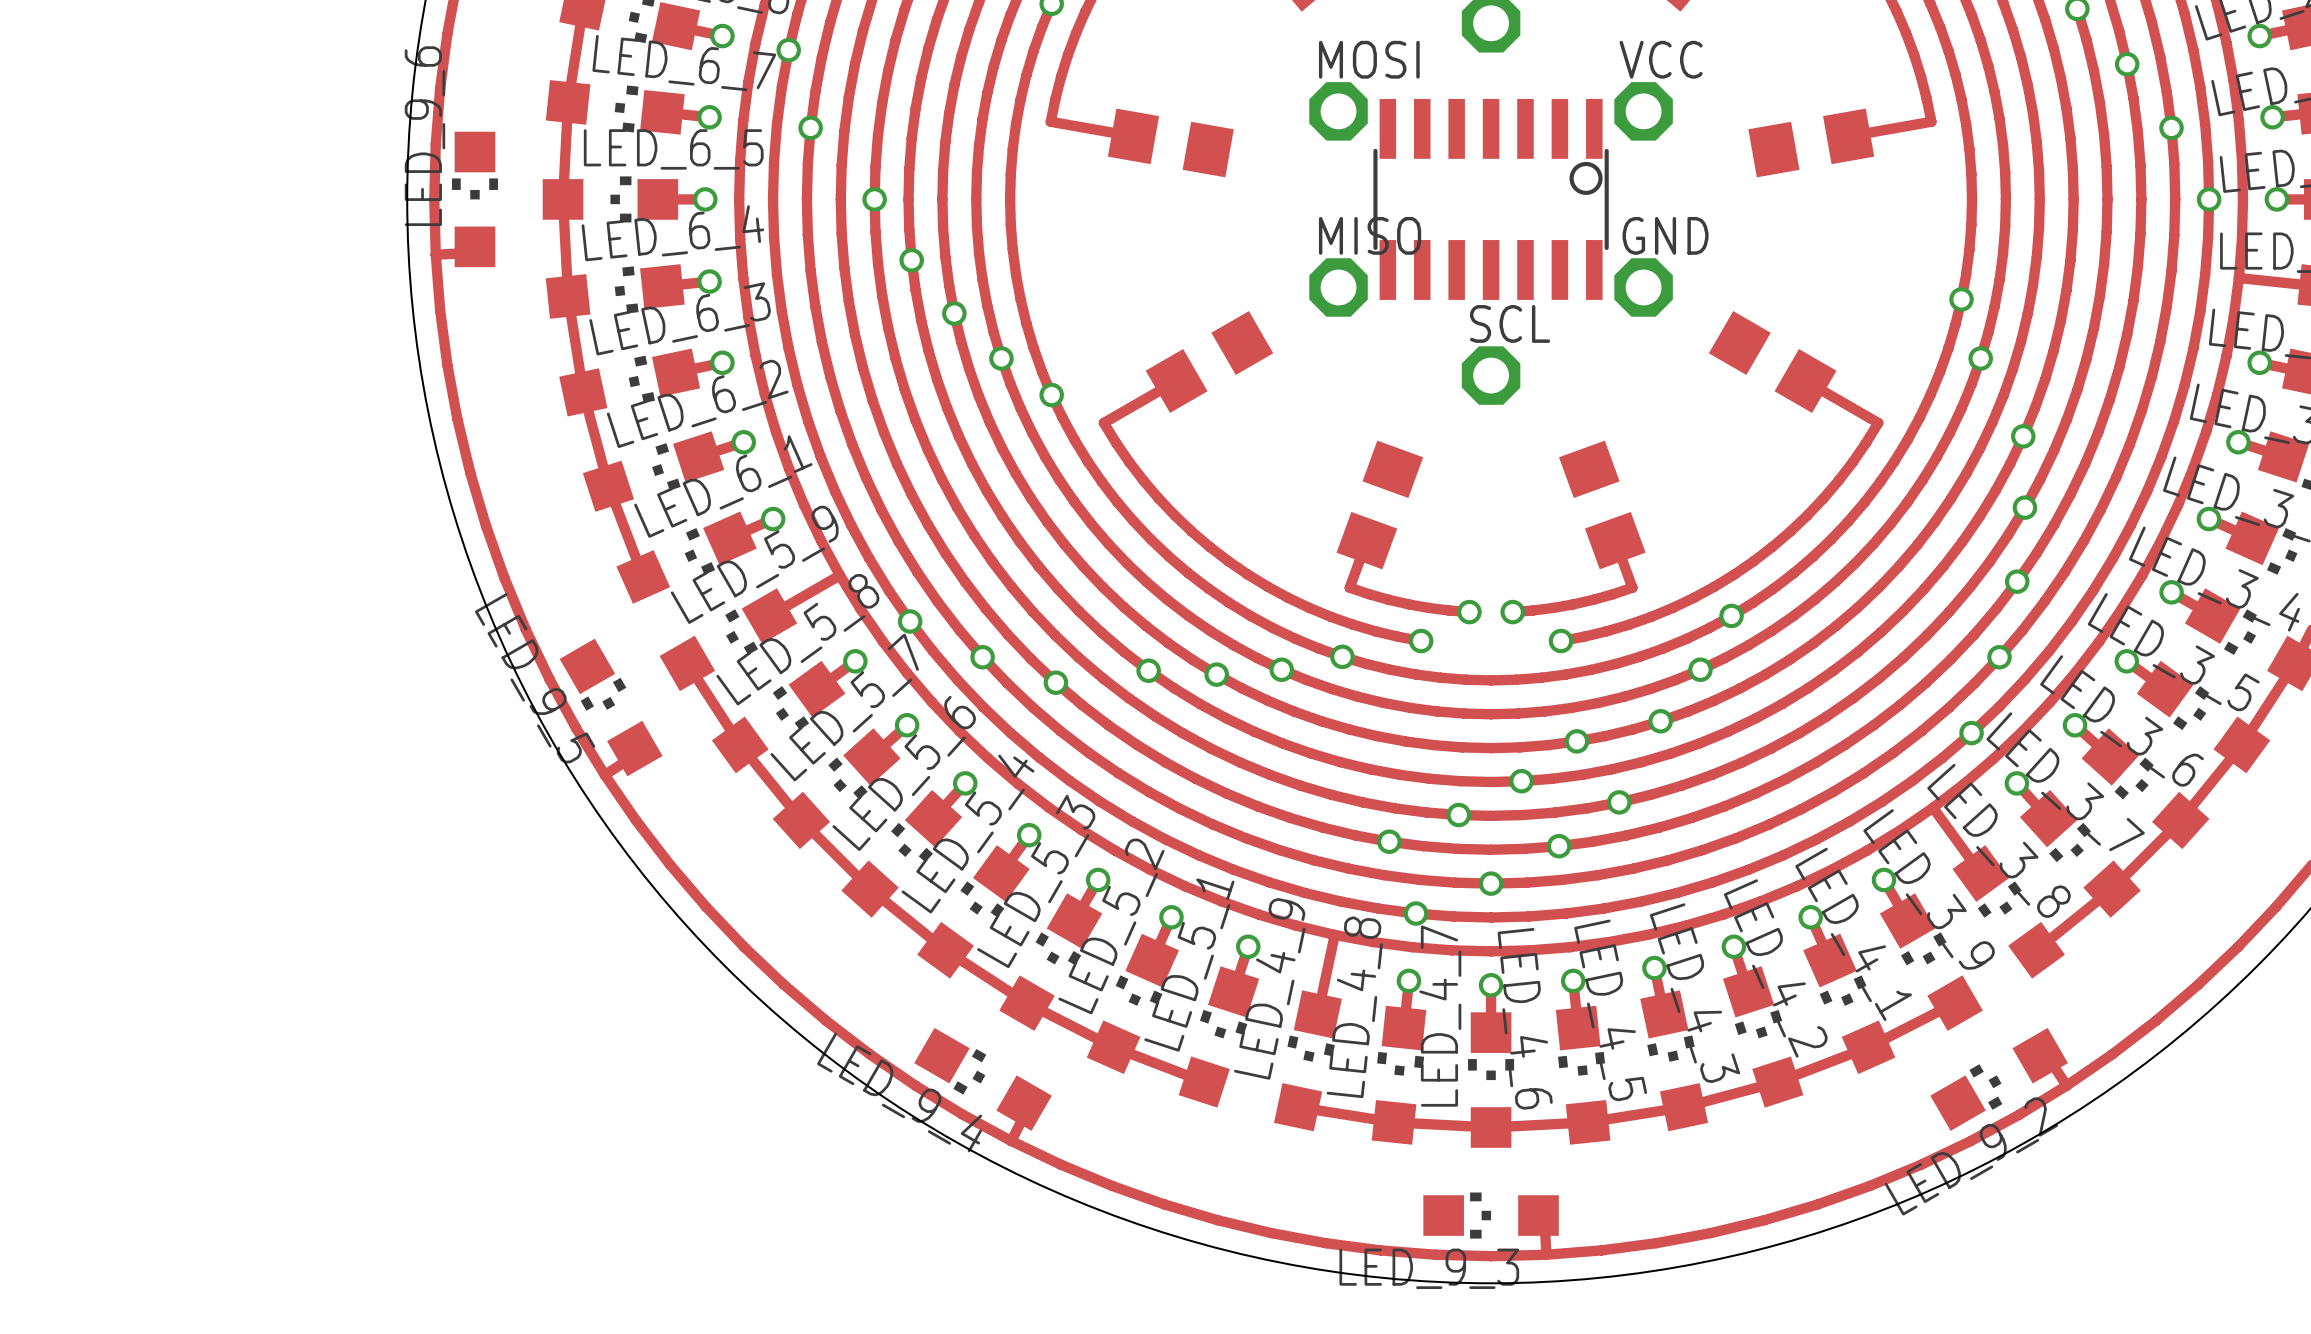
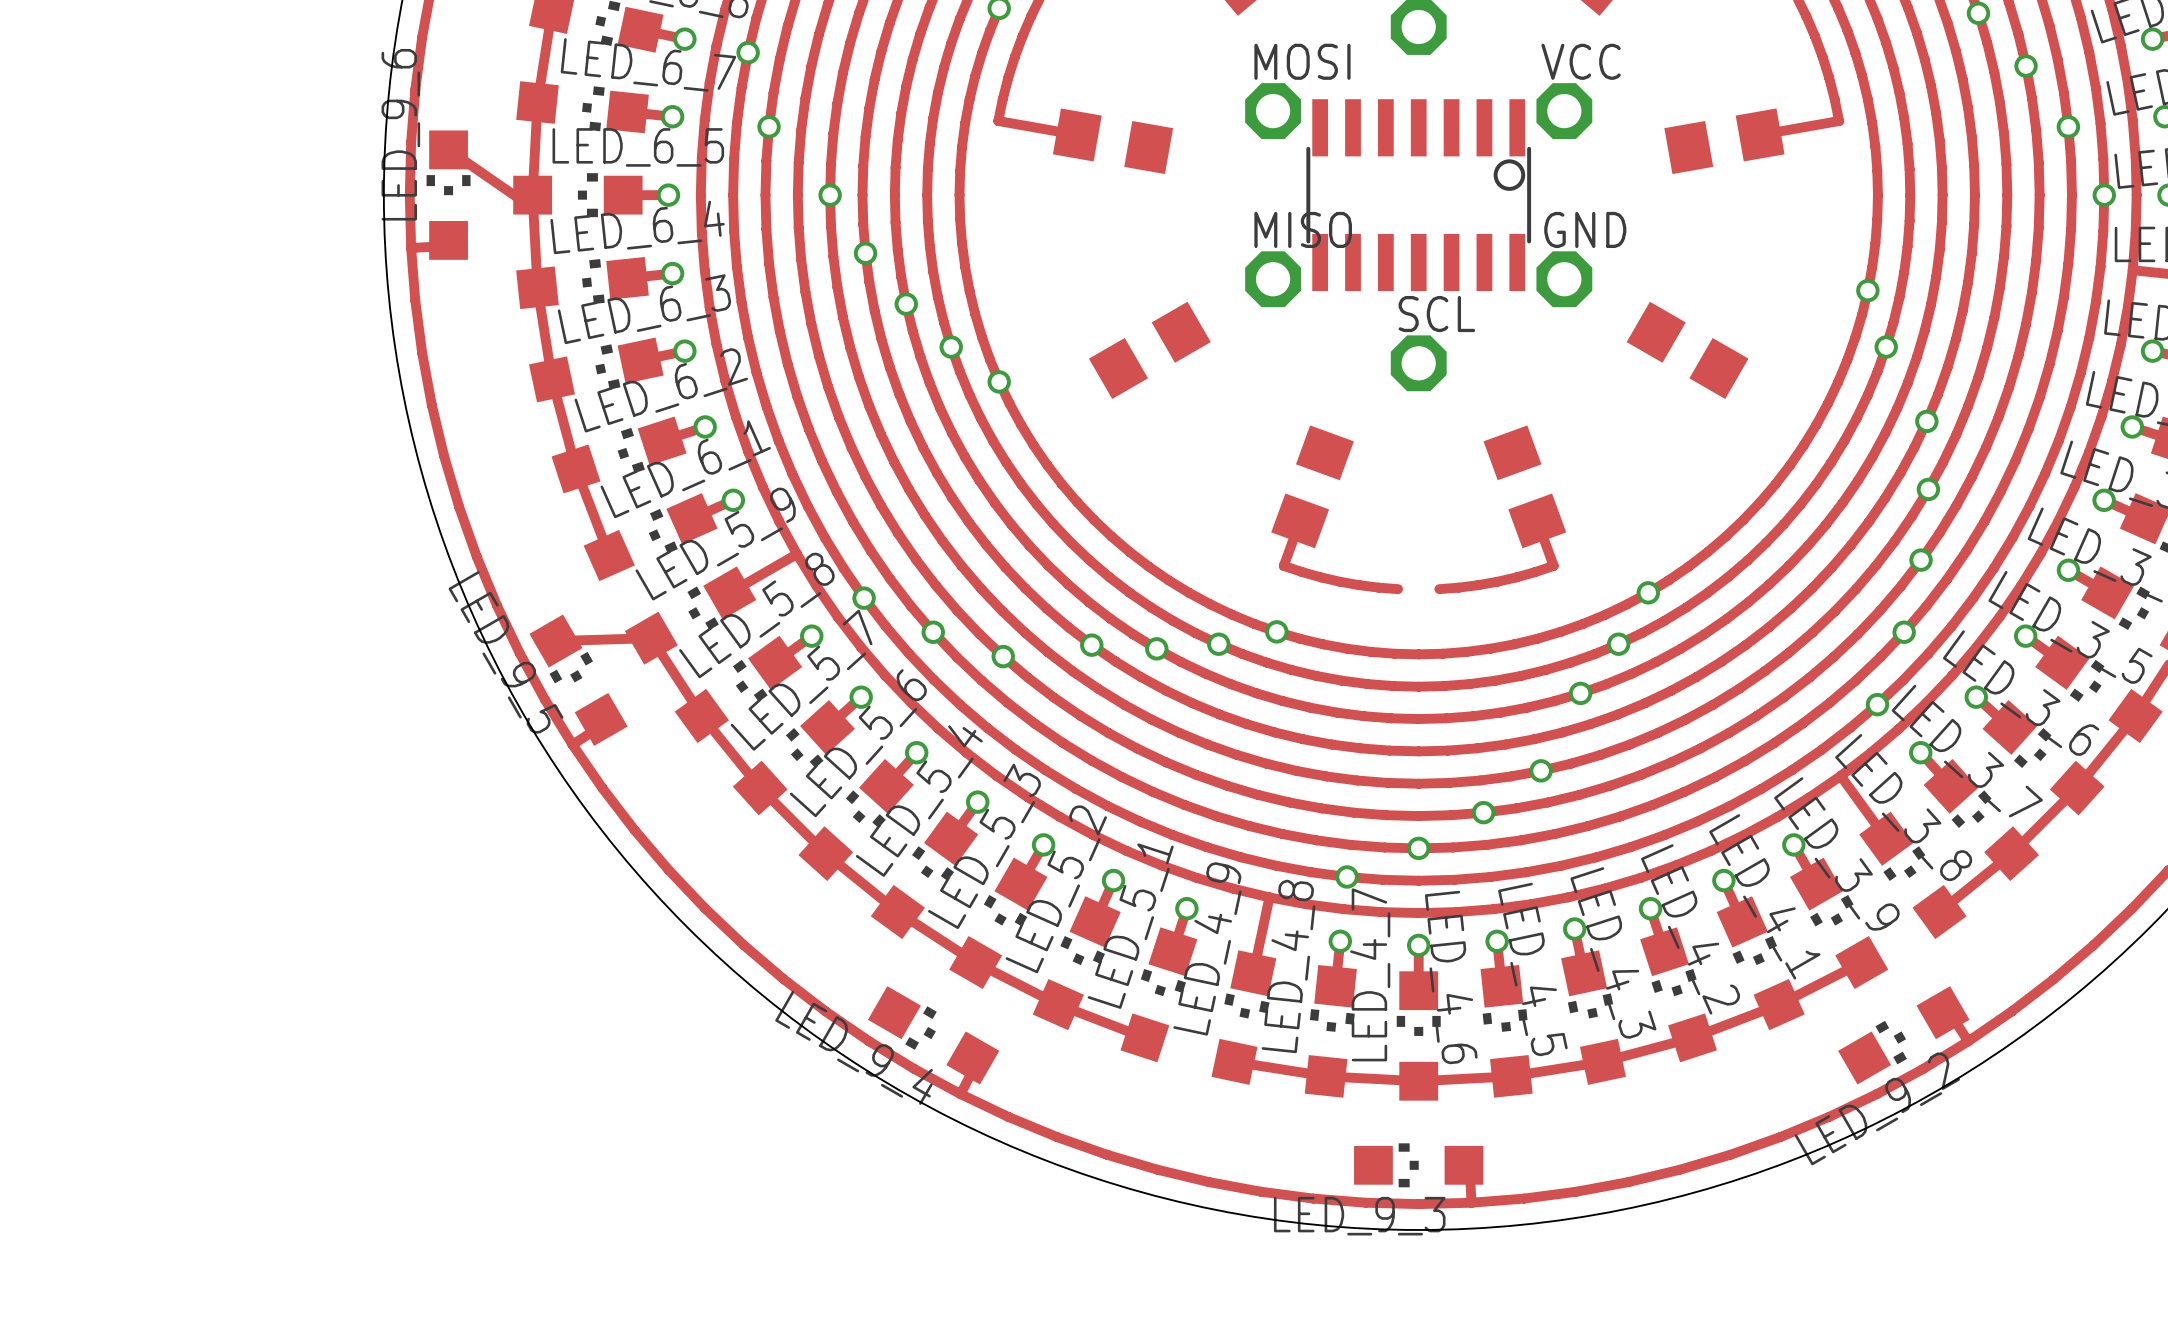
track: none -> (448, 149) (533, 208)
track: (1174, 382) (1103, 422) (1143, 480) (1174, 515) (1228, 561) (1288, 597) (1352, 624) (1421, 641) -> none
track: (1807, 382) (1878, 422) (1838, 480) (1807, 515) (1753, 561) (1694, 597) (1629, 624) (1561, 641) -> none
via: (1469, 612) -> none
via: (1512, 612) -> none
via: (1421, 641) -> none
via: (1561, 641) -> none
track: none -> (651, 638) (555, 641)
via: (1576, 741) -> none
via: (1521, 781) -> none
via: (1458, 815) -> none
via: (1389, 841) -> none

